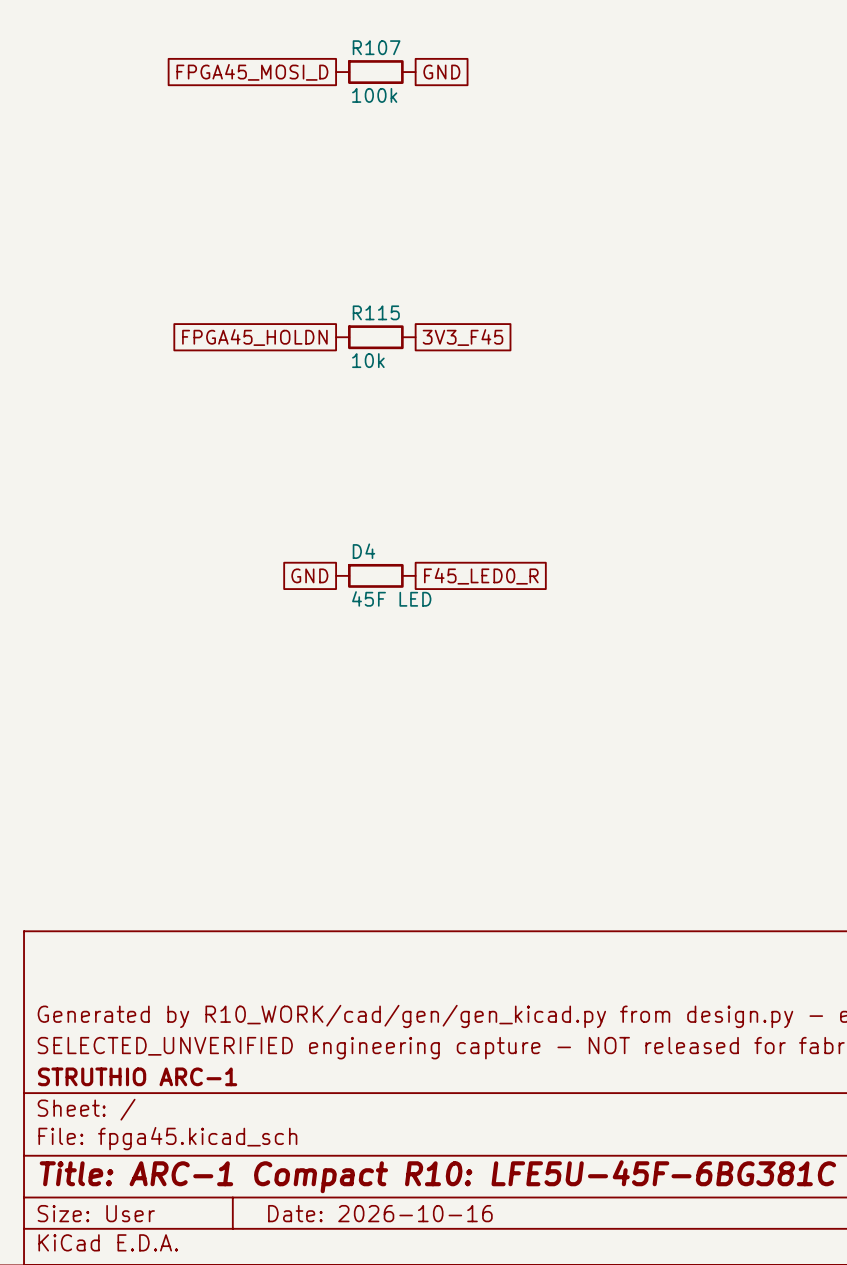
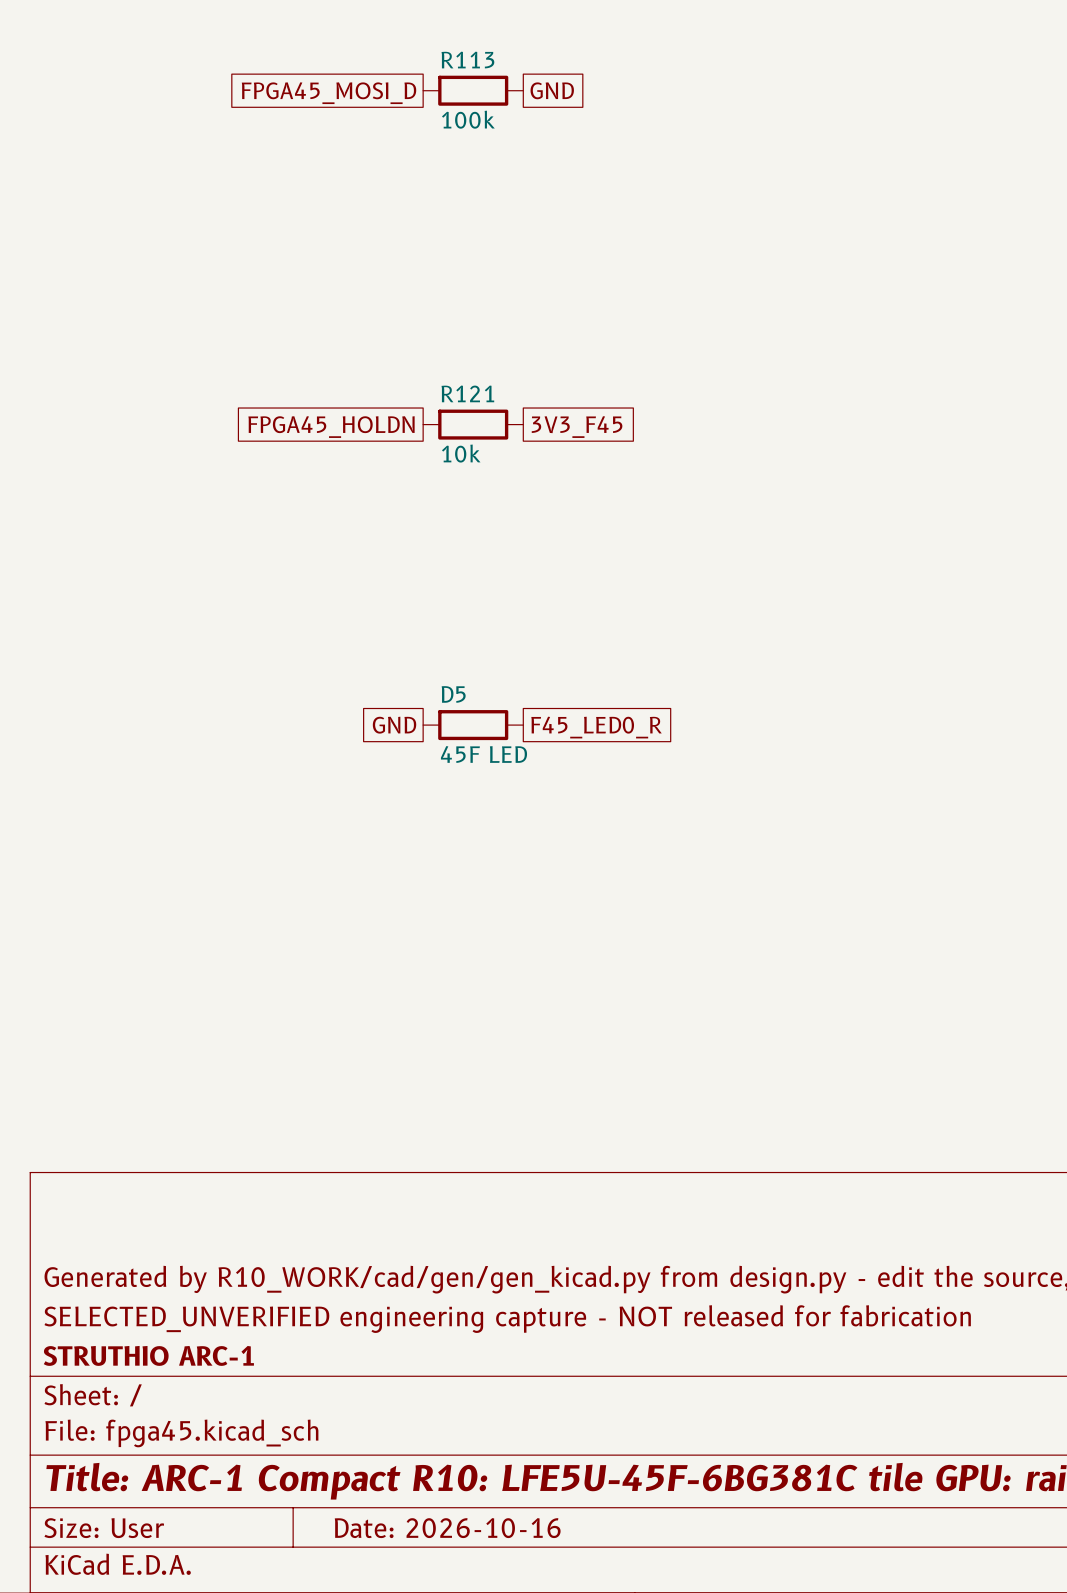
R107 name: R107 (376, 47) -> R113 (467, 60)
R115 name: R115 (376, 312) -> R121 (467, 393)
D4 name: D4 (363, 551) -> D5 (453, 694)

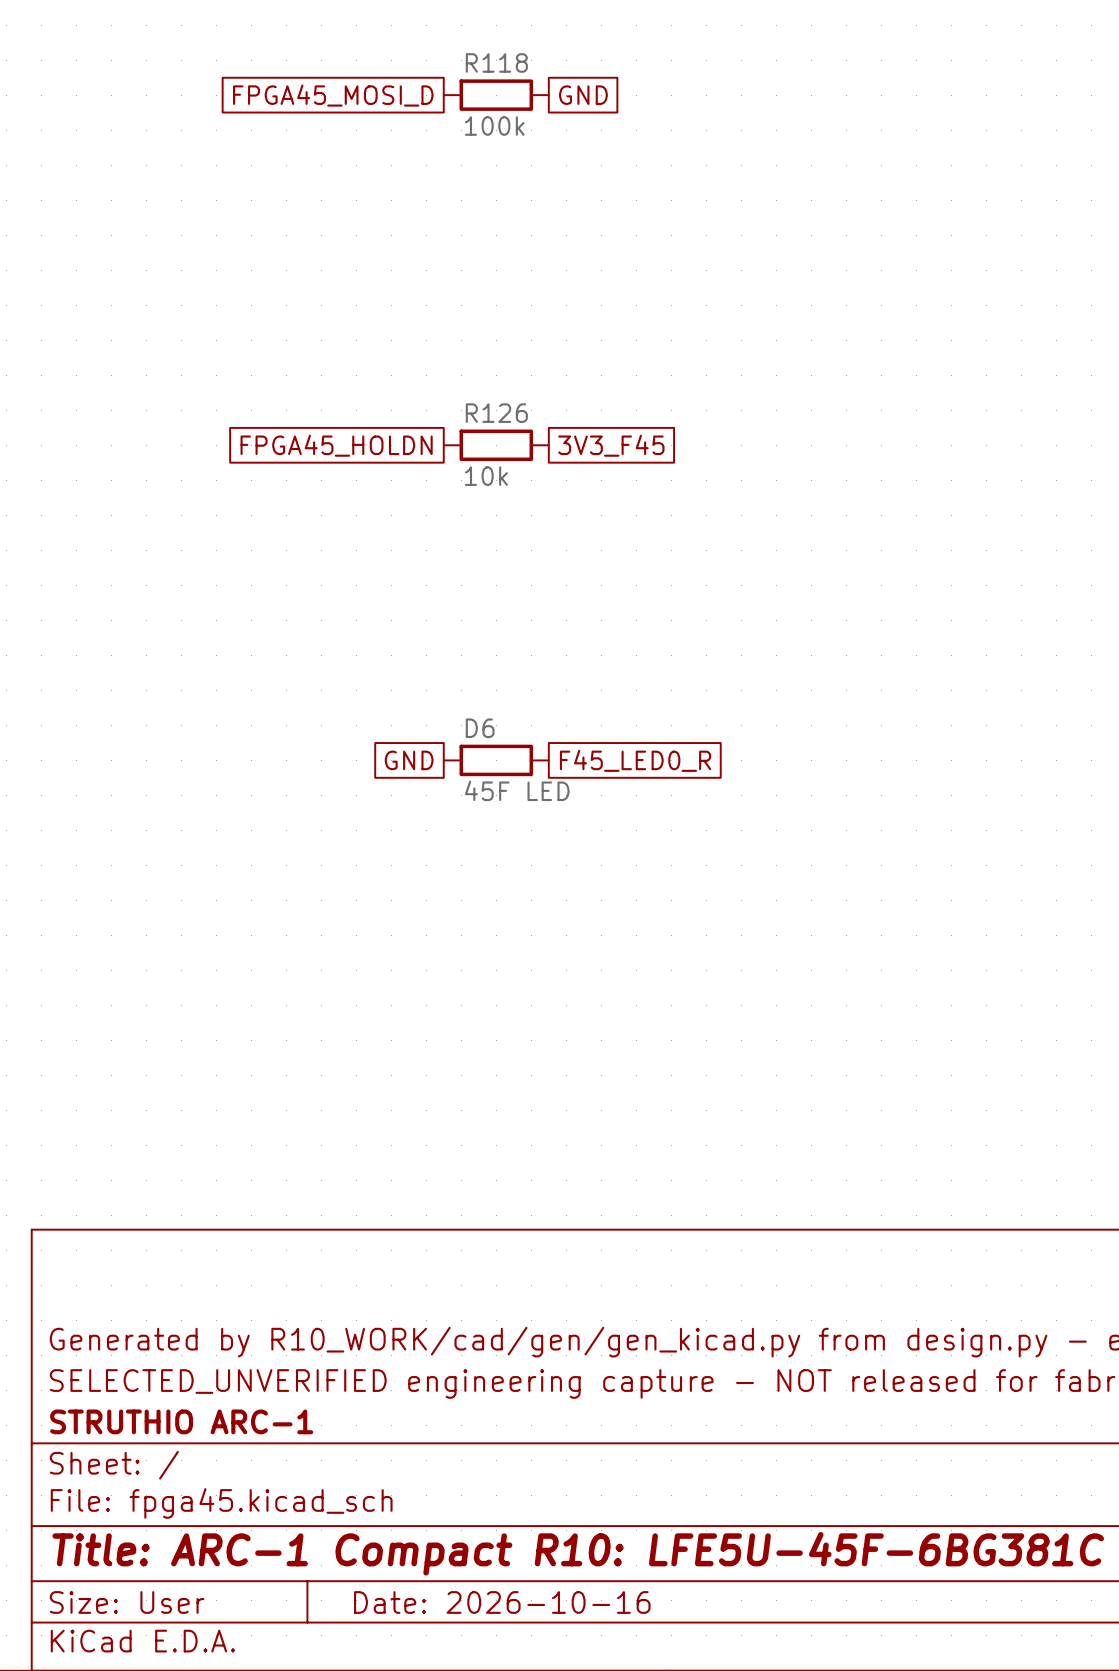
R113 name: R113 (467, 60) -> R118 (496, 62)
R121 name: R121 (467, 393) -> R126 (496, 413)
D5 name: D5 (453, 694) -> D6 (480, 728)

